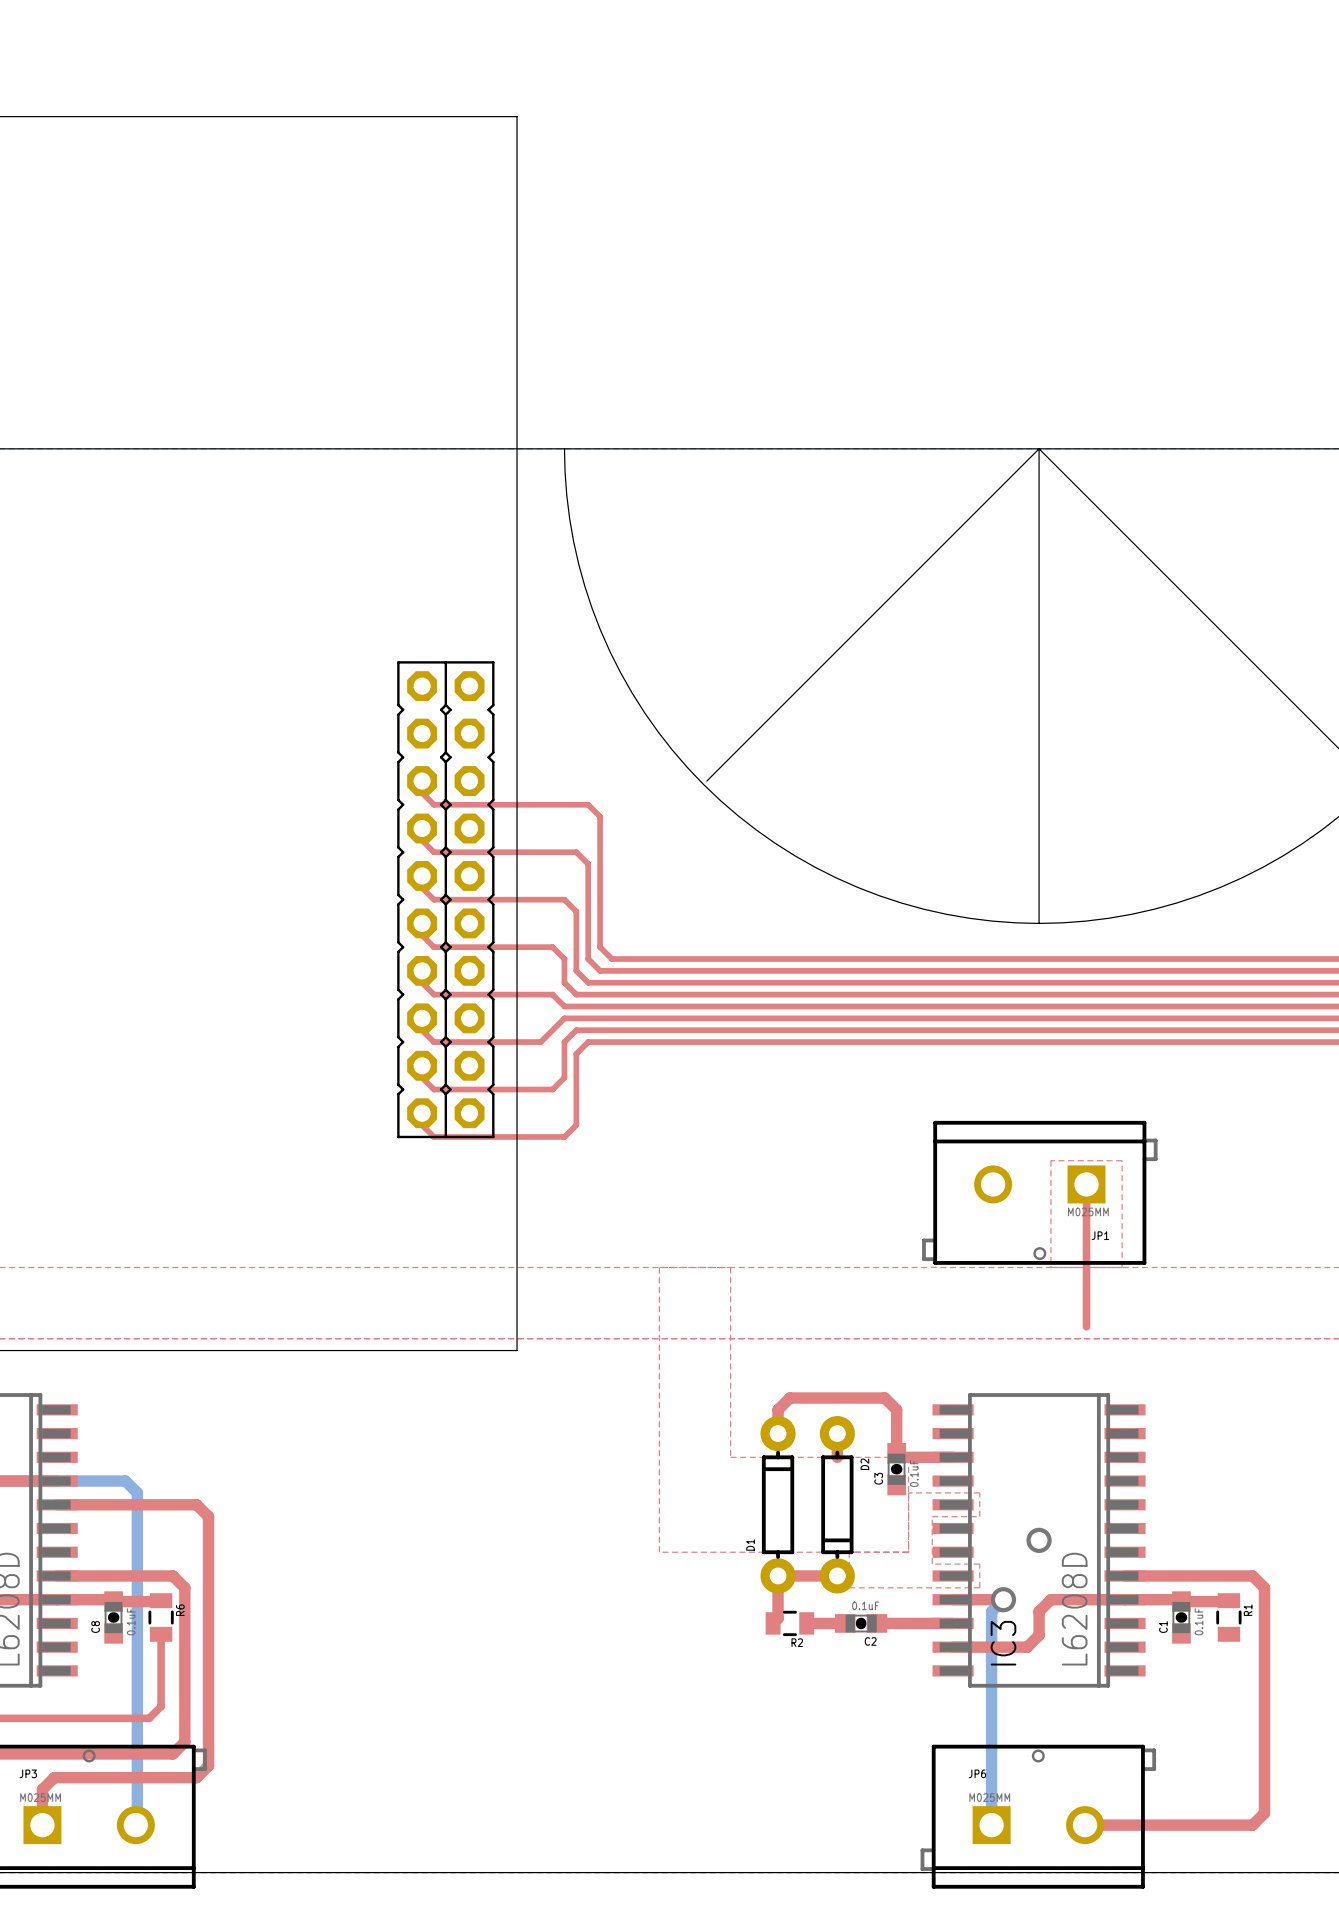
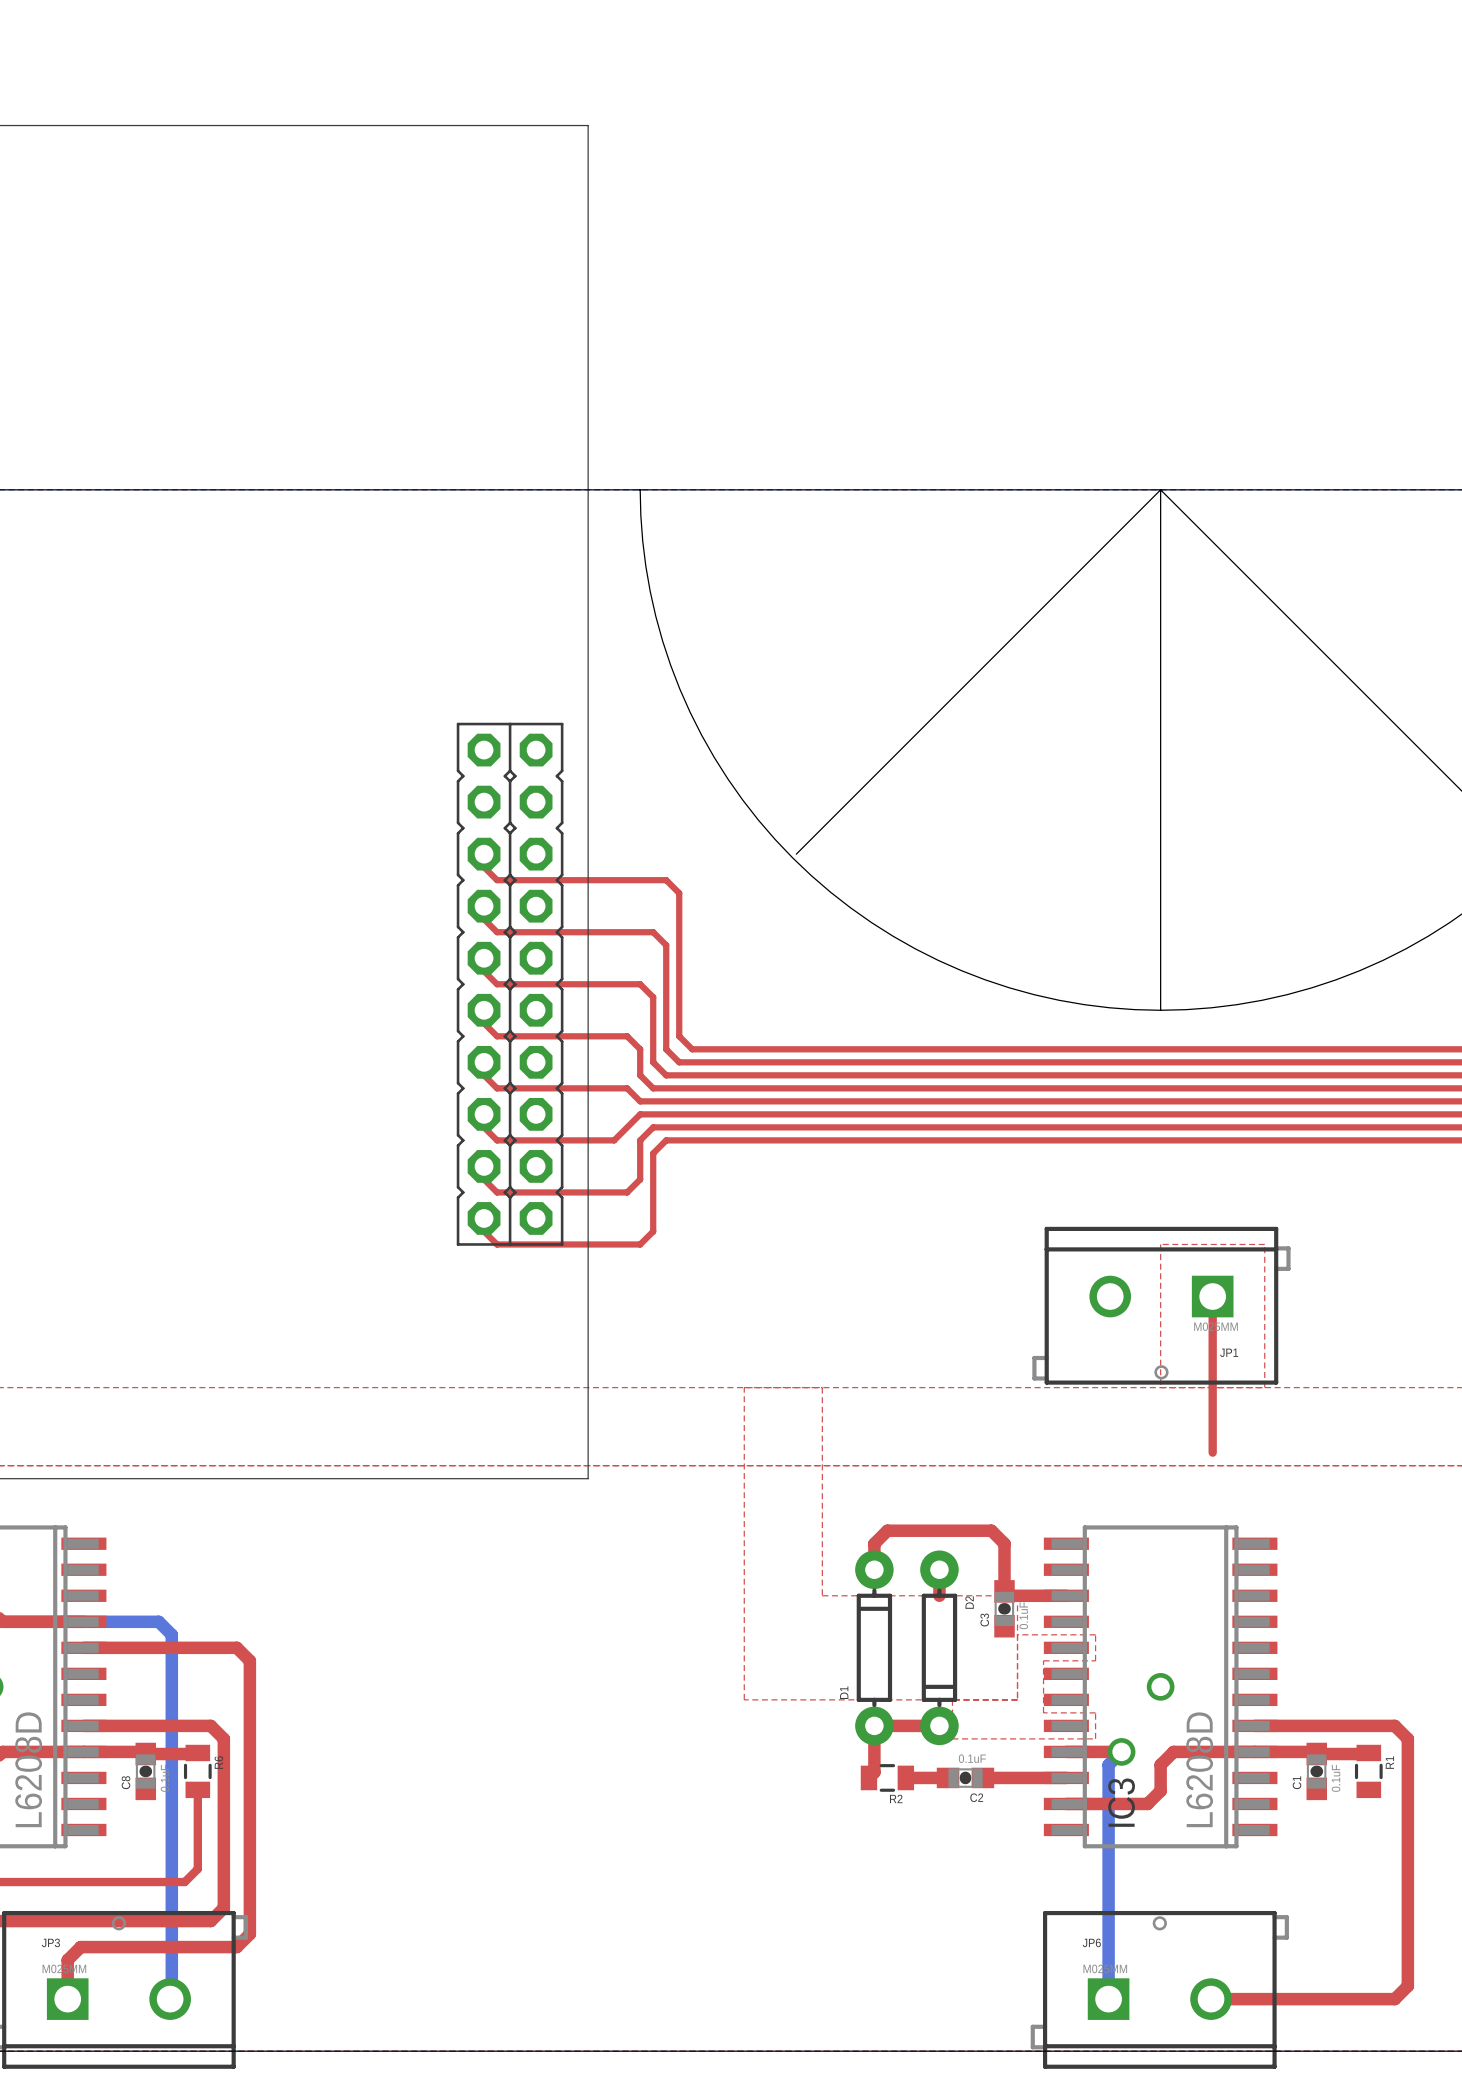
top zone outline: none -> (1160, 1387) (1160, 1244) (1264, 1244) (1264, 1387)
top zone outline: (1050, 1267) (1050, 1160) (1122, 1160) (1122, 1267) -> none

